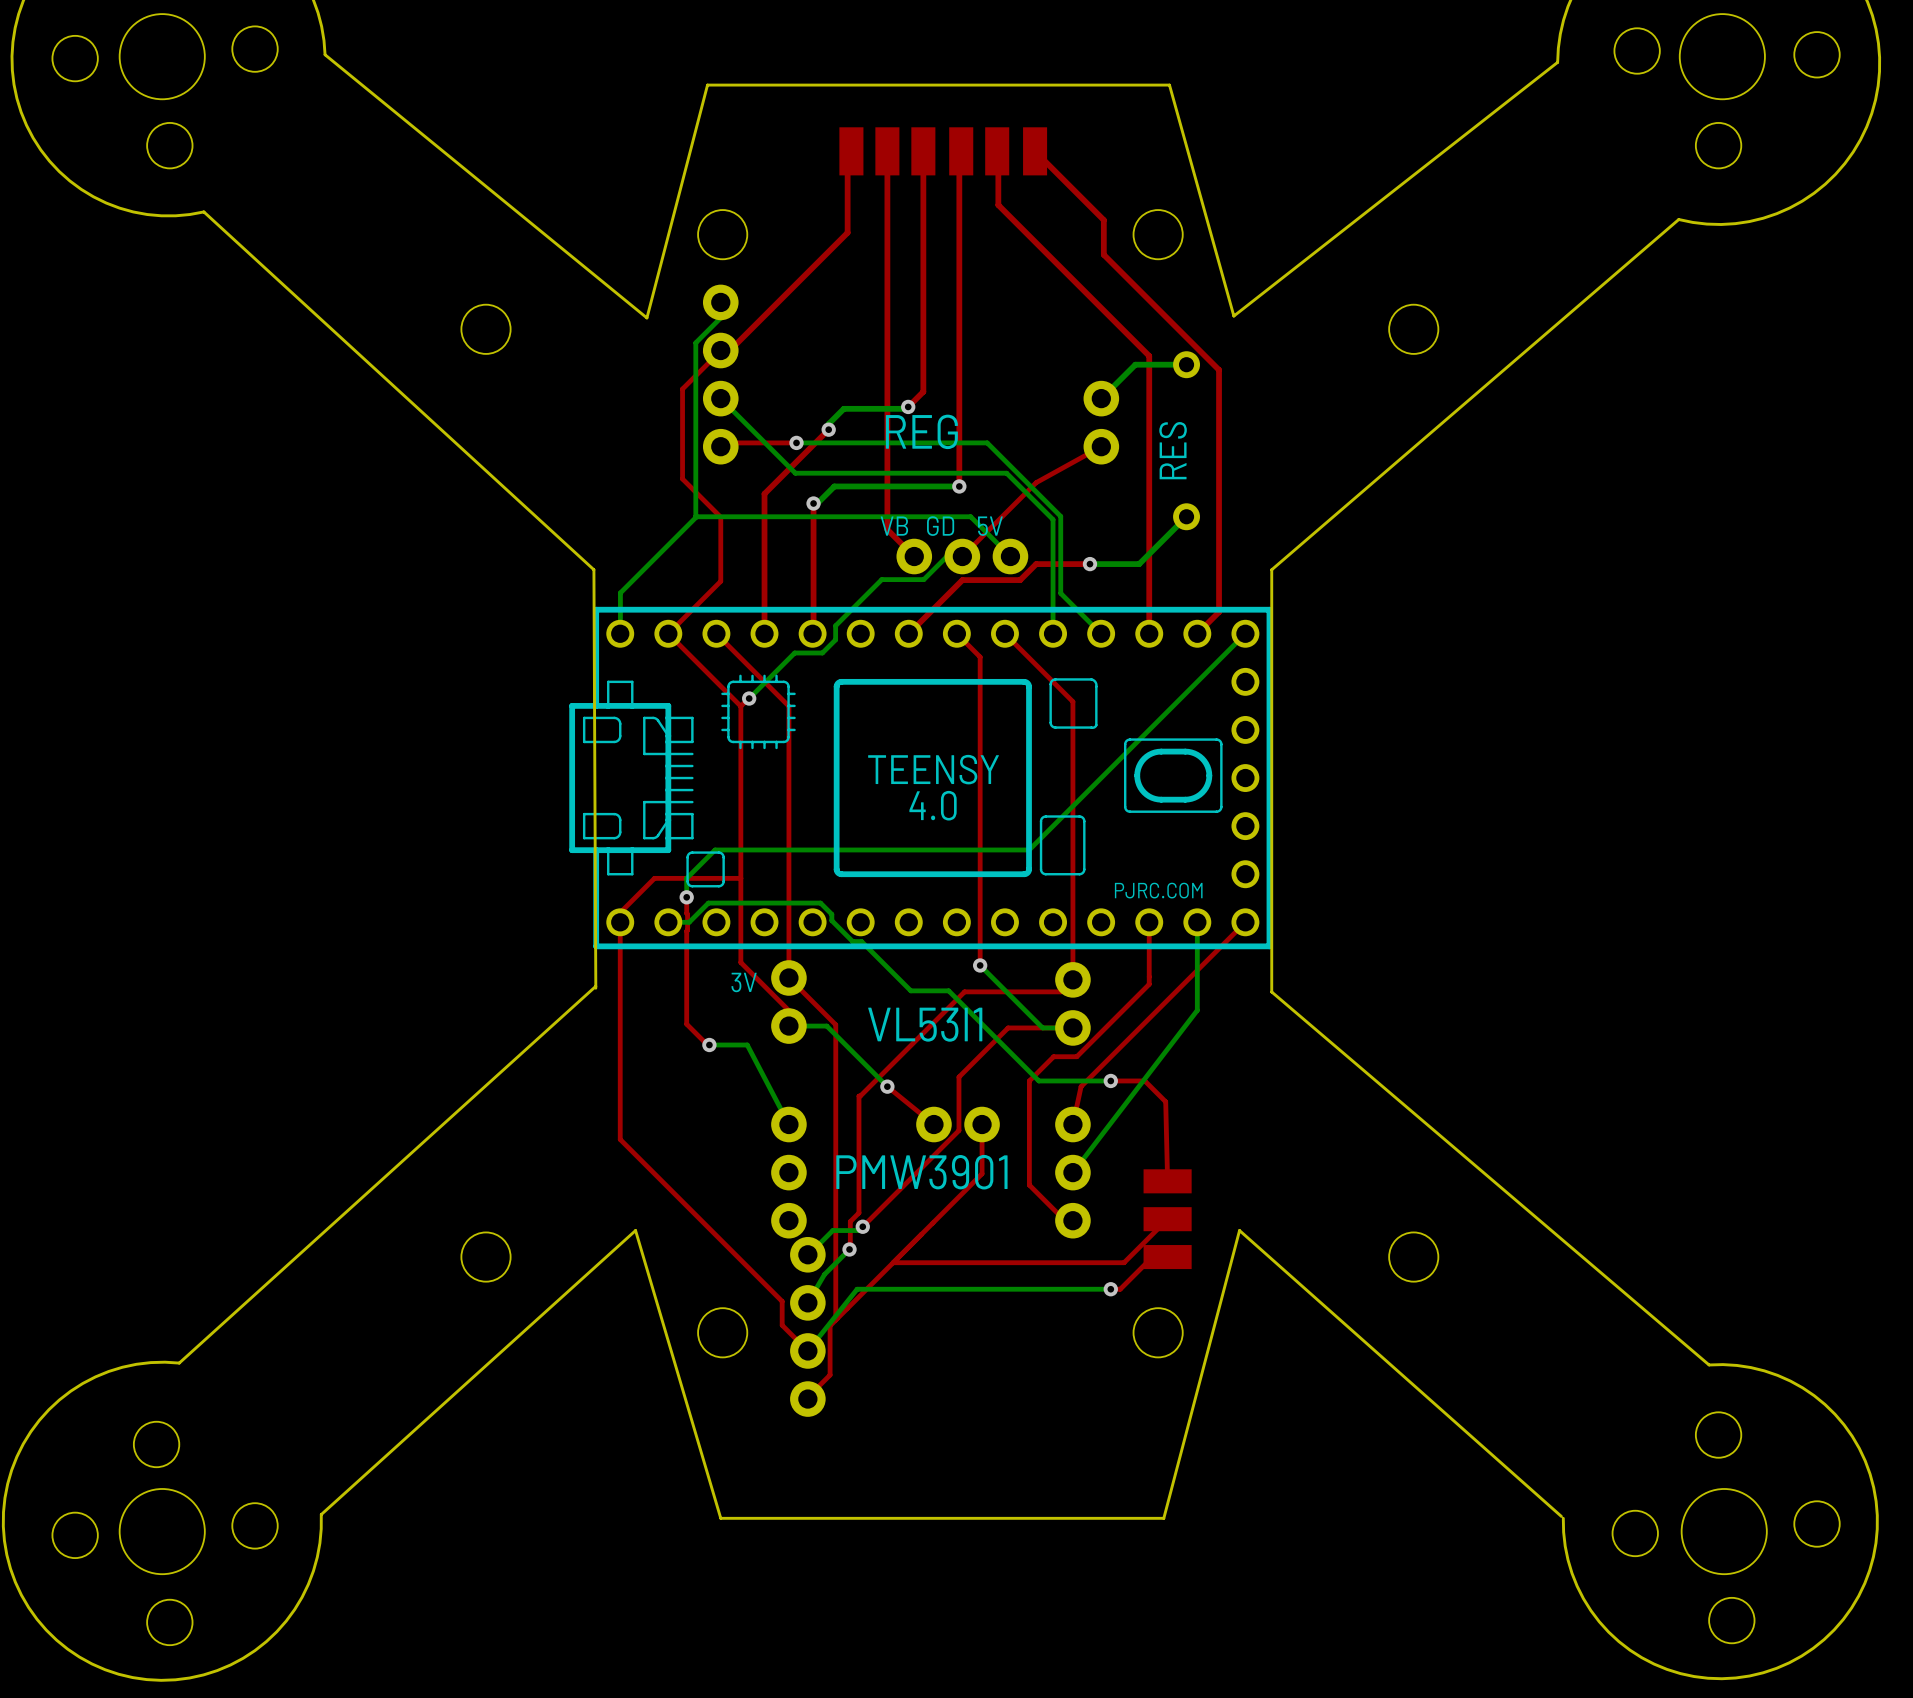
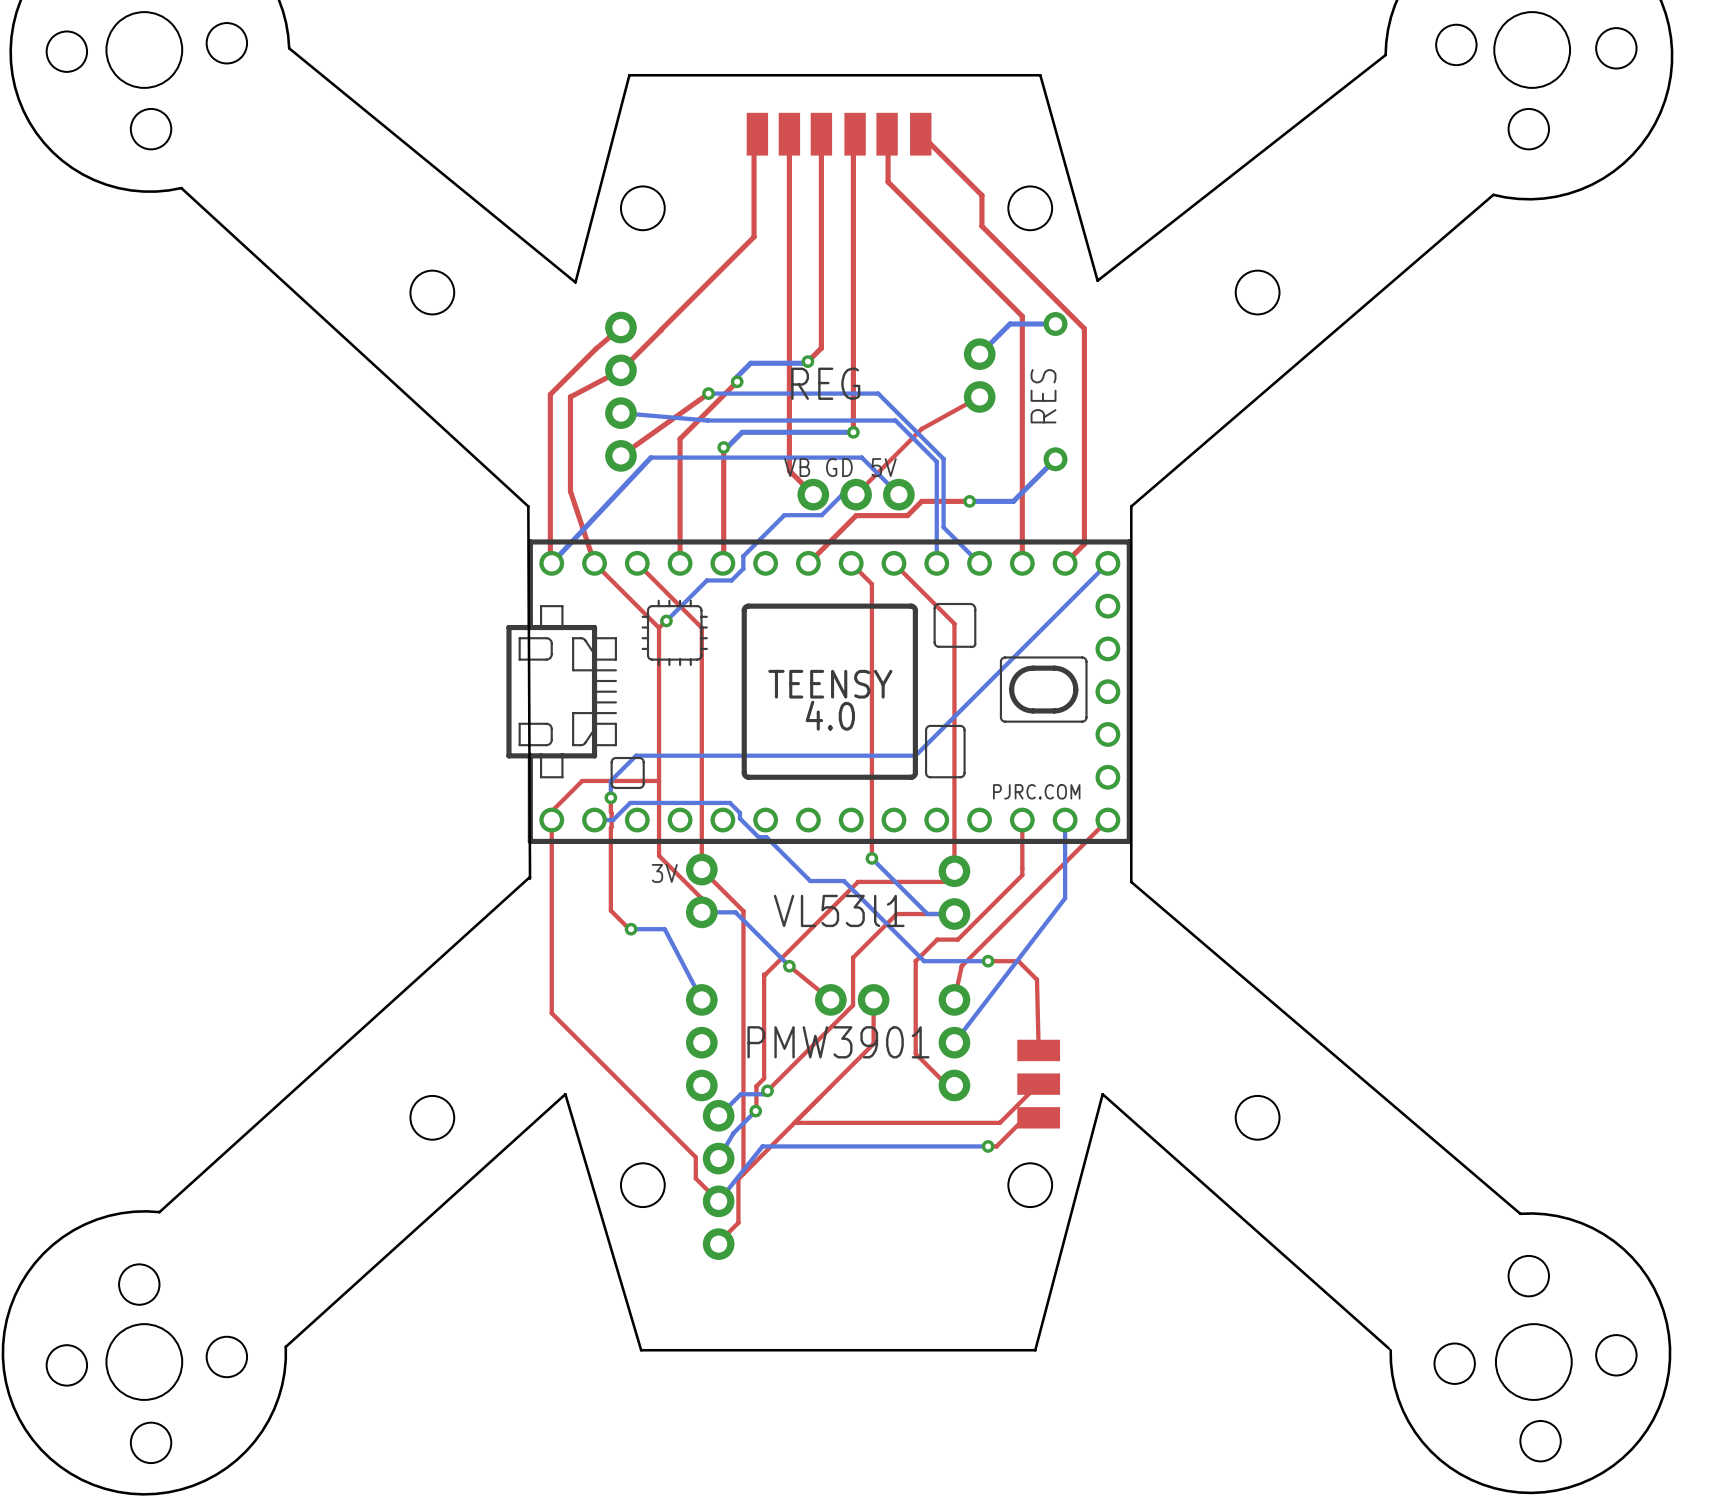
top track: (847, 232) (728, 352) (705, 352) -> (754, 206) (754, 236) (620, 370) (570, 396) (570, 491) (594, 563)
bottom track: (720, 302) (720, 317) (695, 342) (696, 517) (620, 592) (620, 633) -> none
top track: (720, 350) (682, 389) (682, 478) (720, 517) (720, 581) (673, 628) -> none
top track: none -> (620, 327) (595, 349) (550, 394) (551, 563)
part position: (720, 374) -> (620, 391)
bottom track: (720, 398) (795, 473) -> (620, 413) (707, 420)
top track: (796, 442) (724, 442) (720, 446) -> (708, 393) (620, 455)
bottom track: (970, 516) (695, 516) -> (863, 459) (861, 457) (650, 457) (551, 563)

